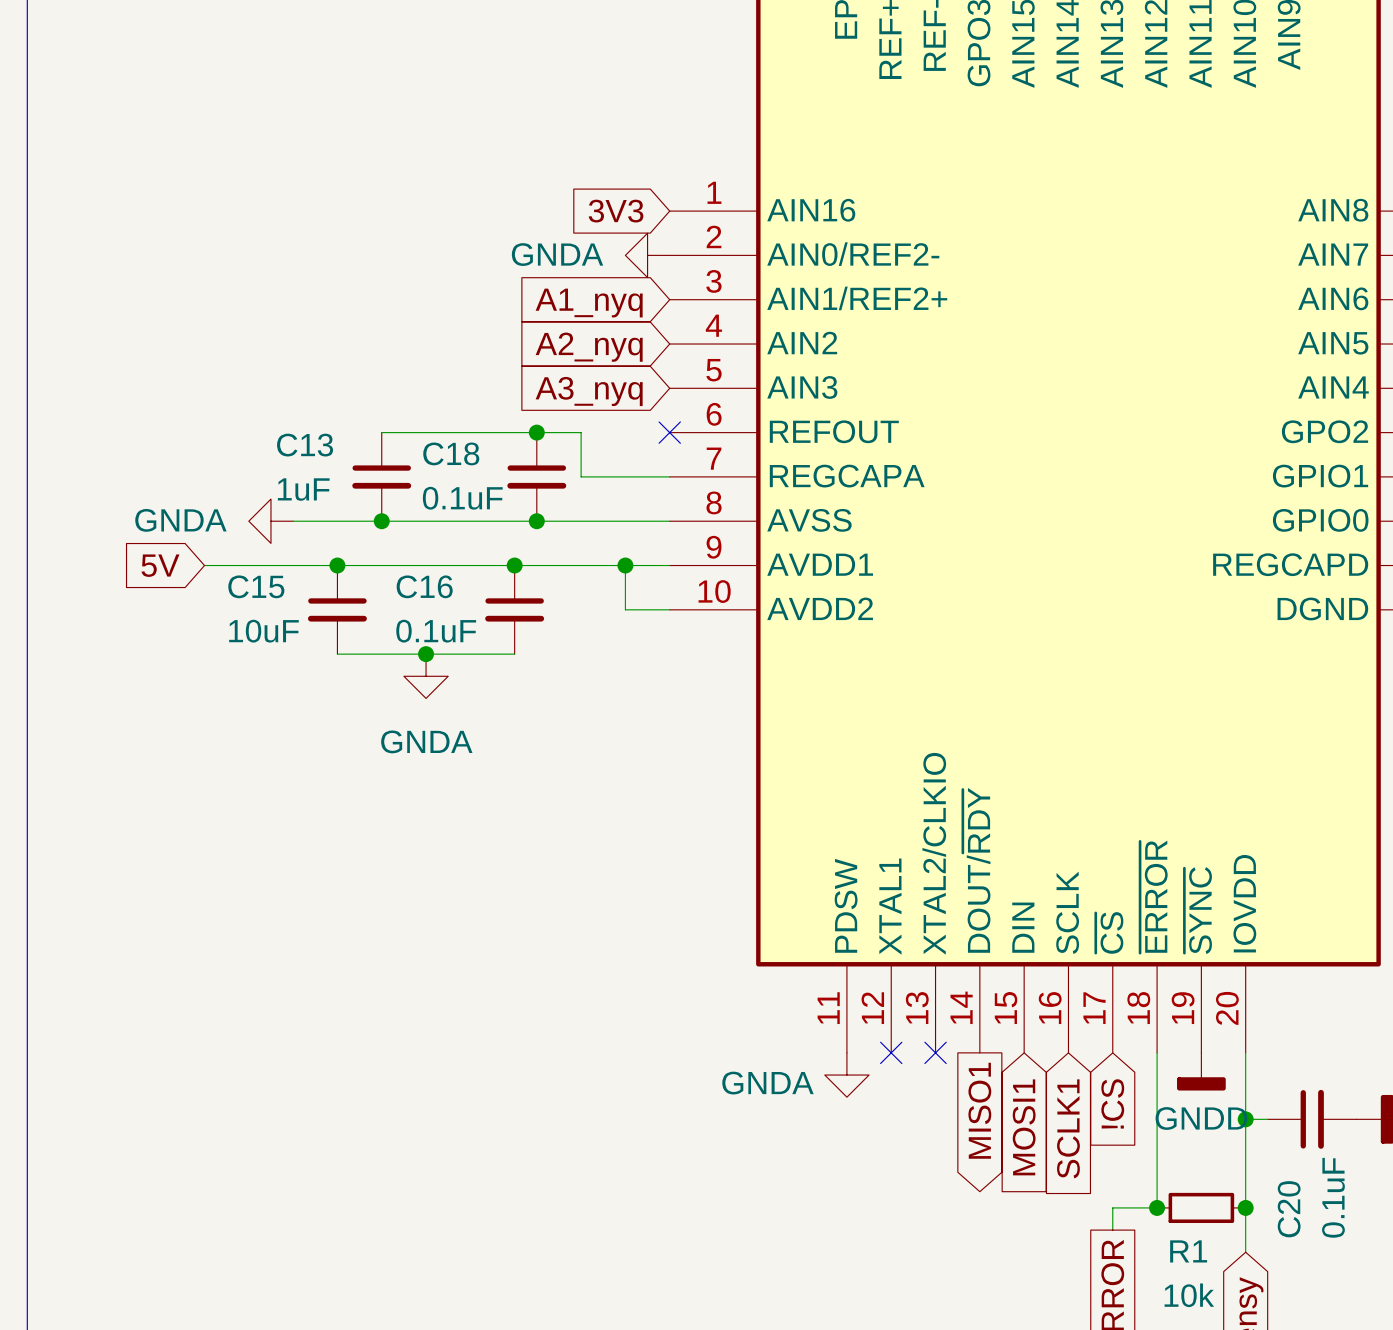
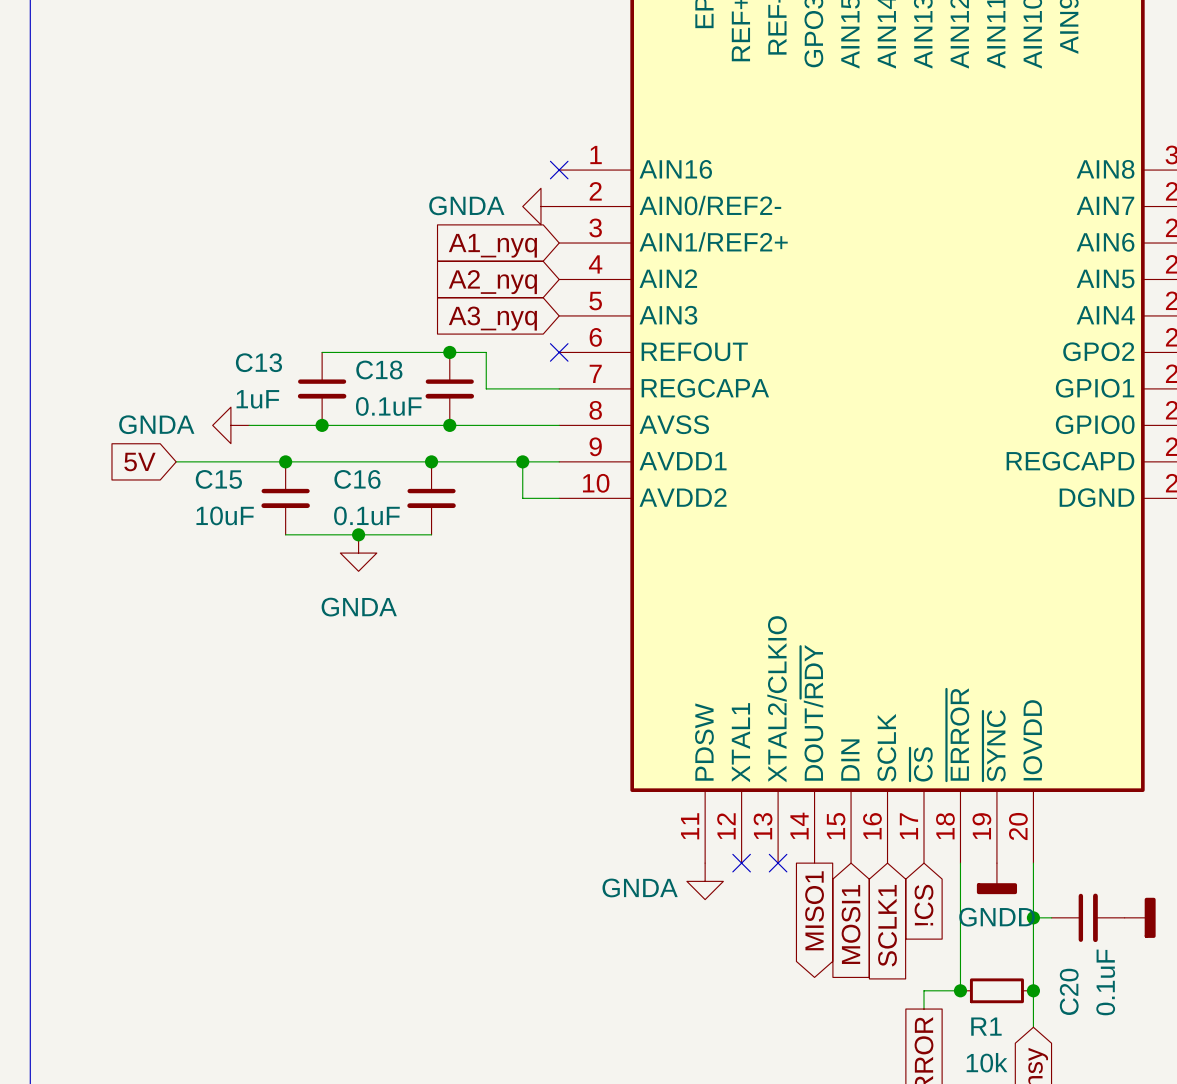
global label: 3V3 (616, 211) -> none
no-connect mark: none -> (559, 170)

